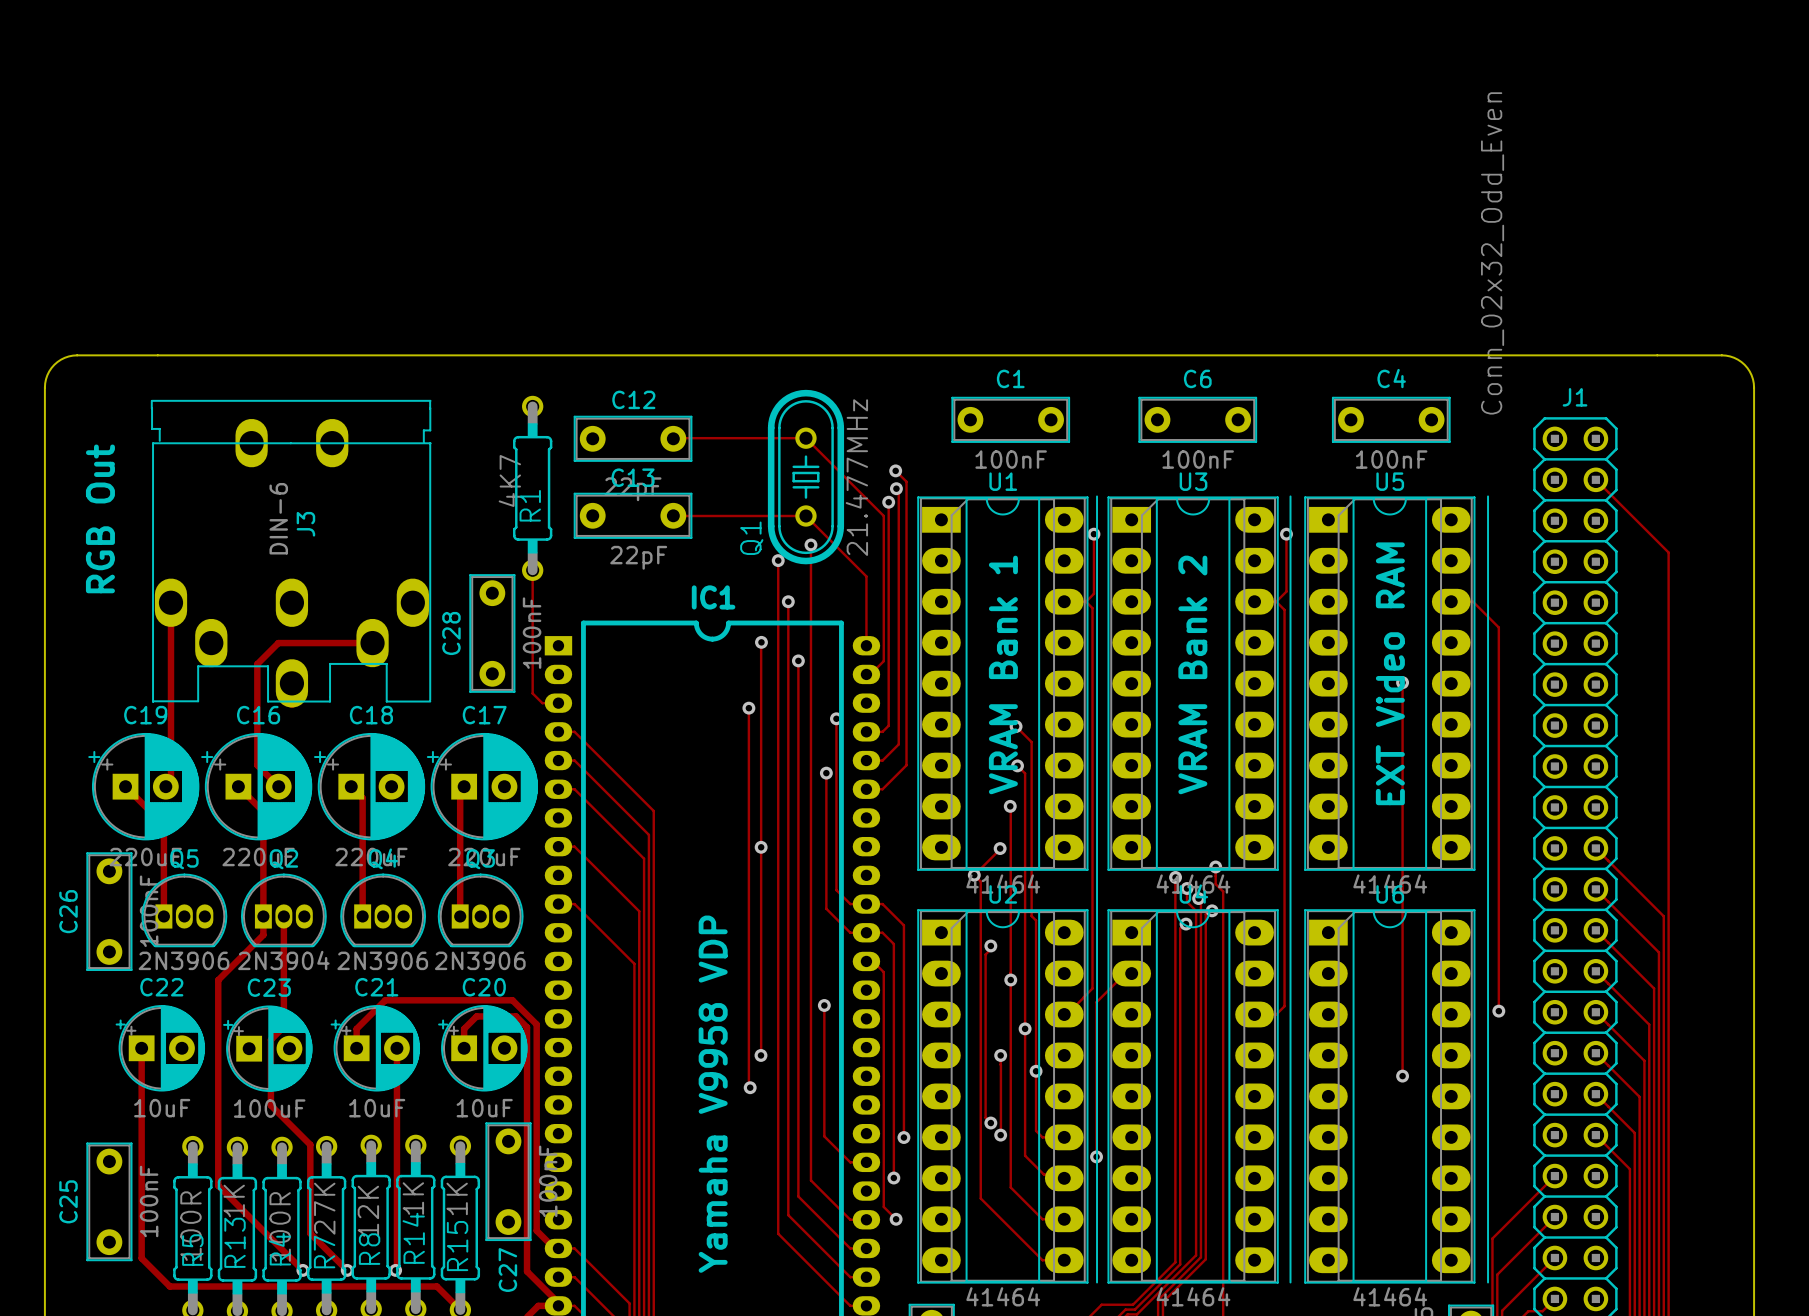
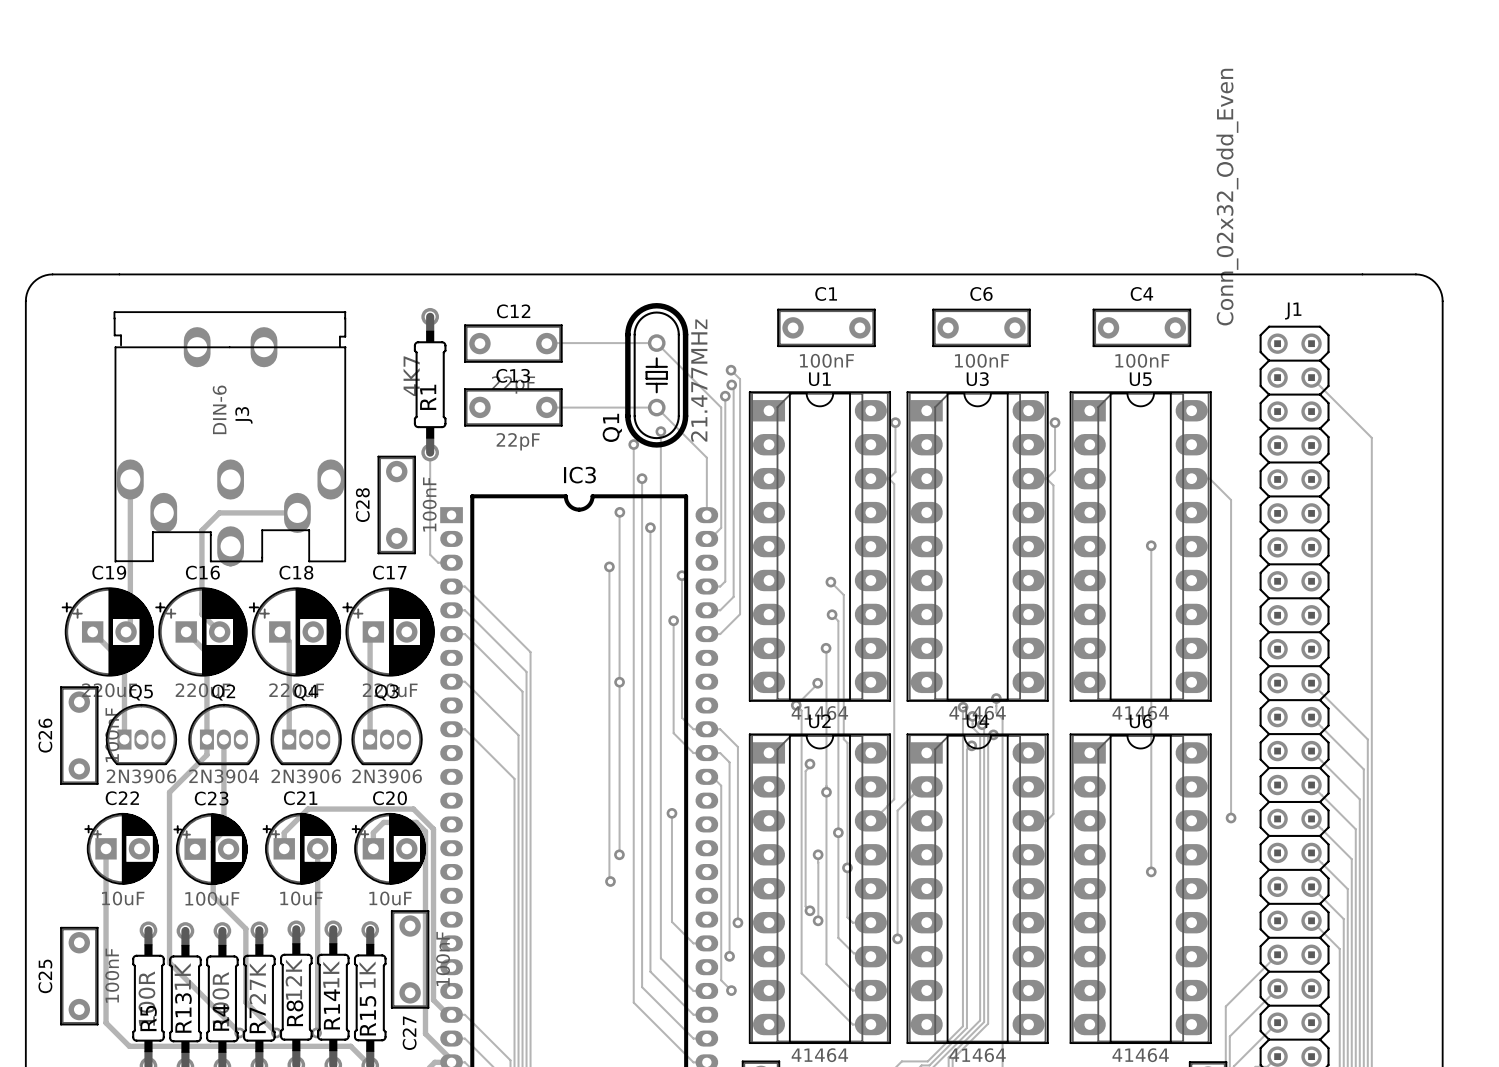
line: (1097, 496) (1097, 1282) -> none
line: (1290, 496) (1290, 1282) -> none
line: (1488, 496) (1488, 1282) -> none
text: RGB Out (100, 518) -> none
IC1 name: IC1 (713, 597) -> IC3 (579, 475)
text: EXT Video RAM (1390, 673) -> none
text: VRAM Bank 1 (1003, 674) -> none
text: VRAM Bank 2 (1192, 674) -> none
text: Yamaha V9958 VDP (713, 1094) -> none

